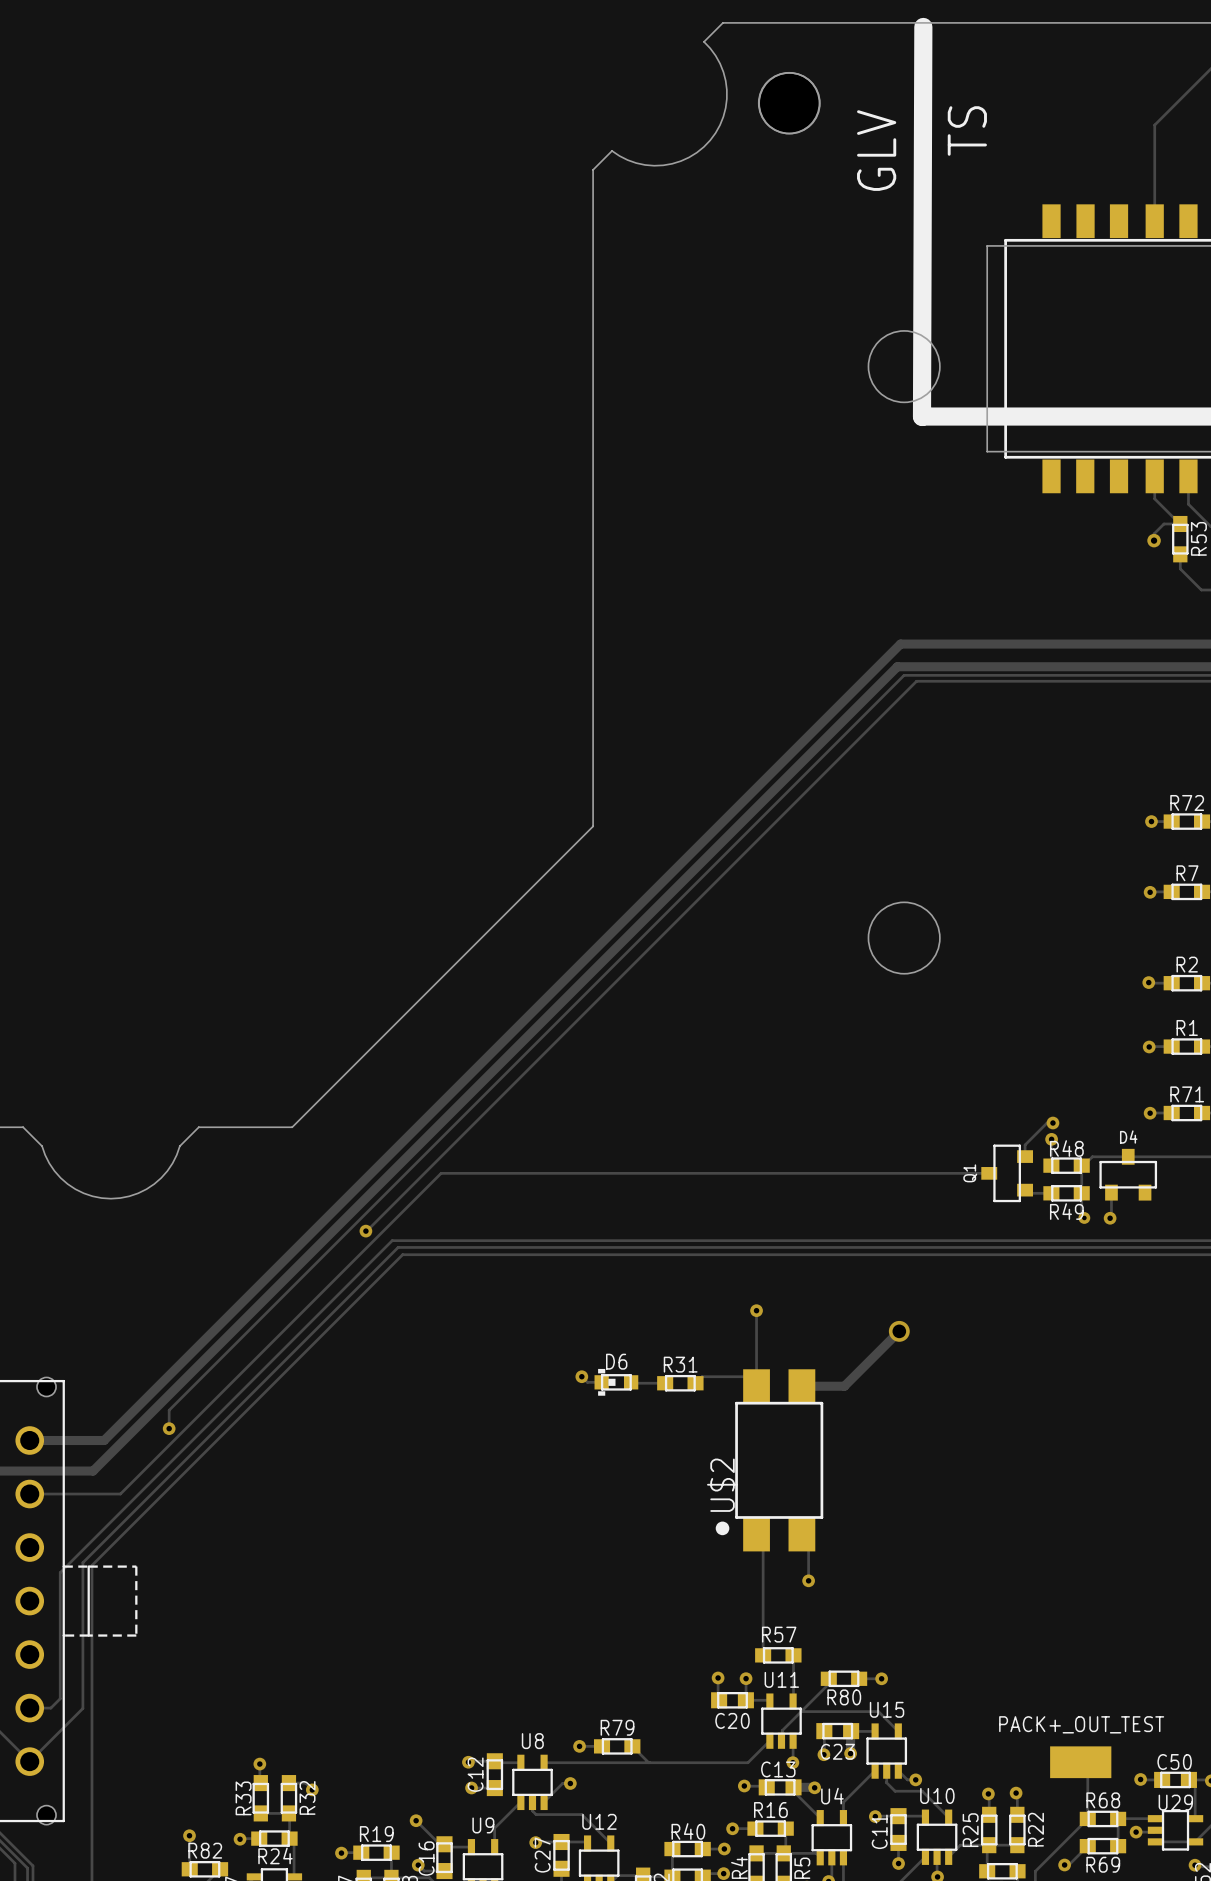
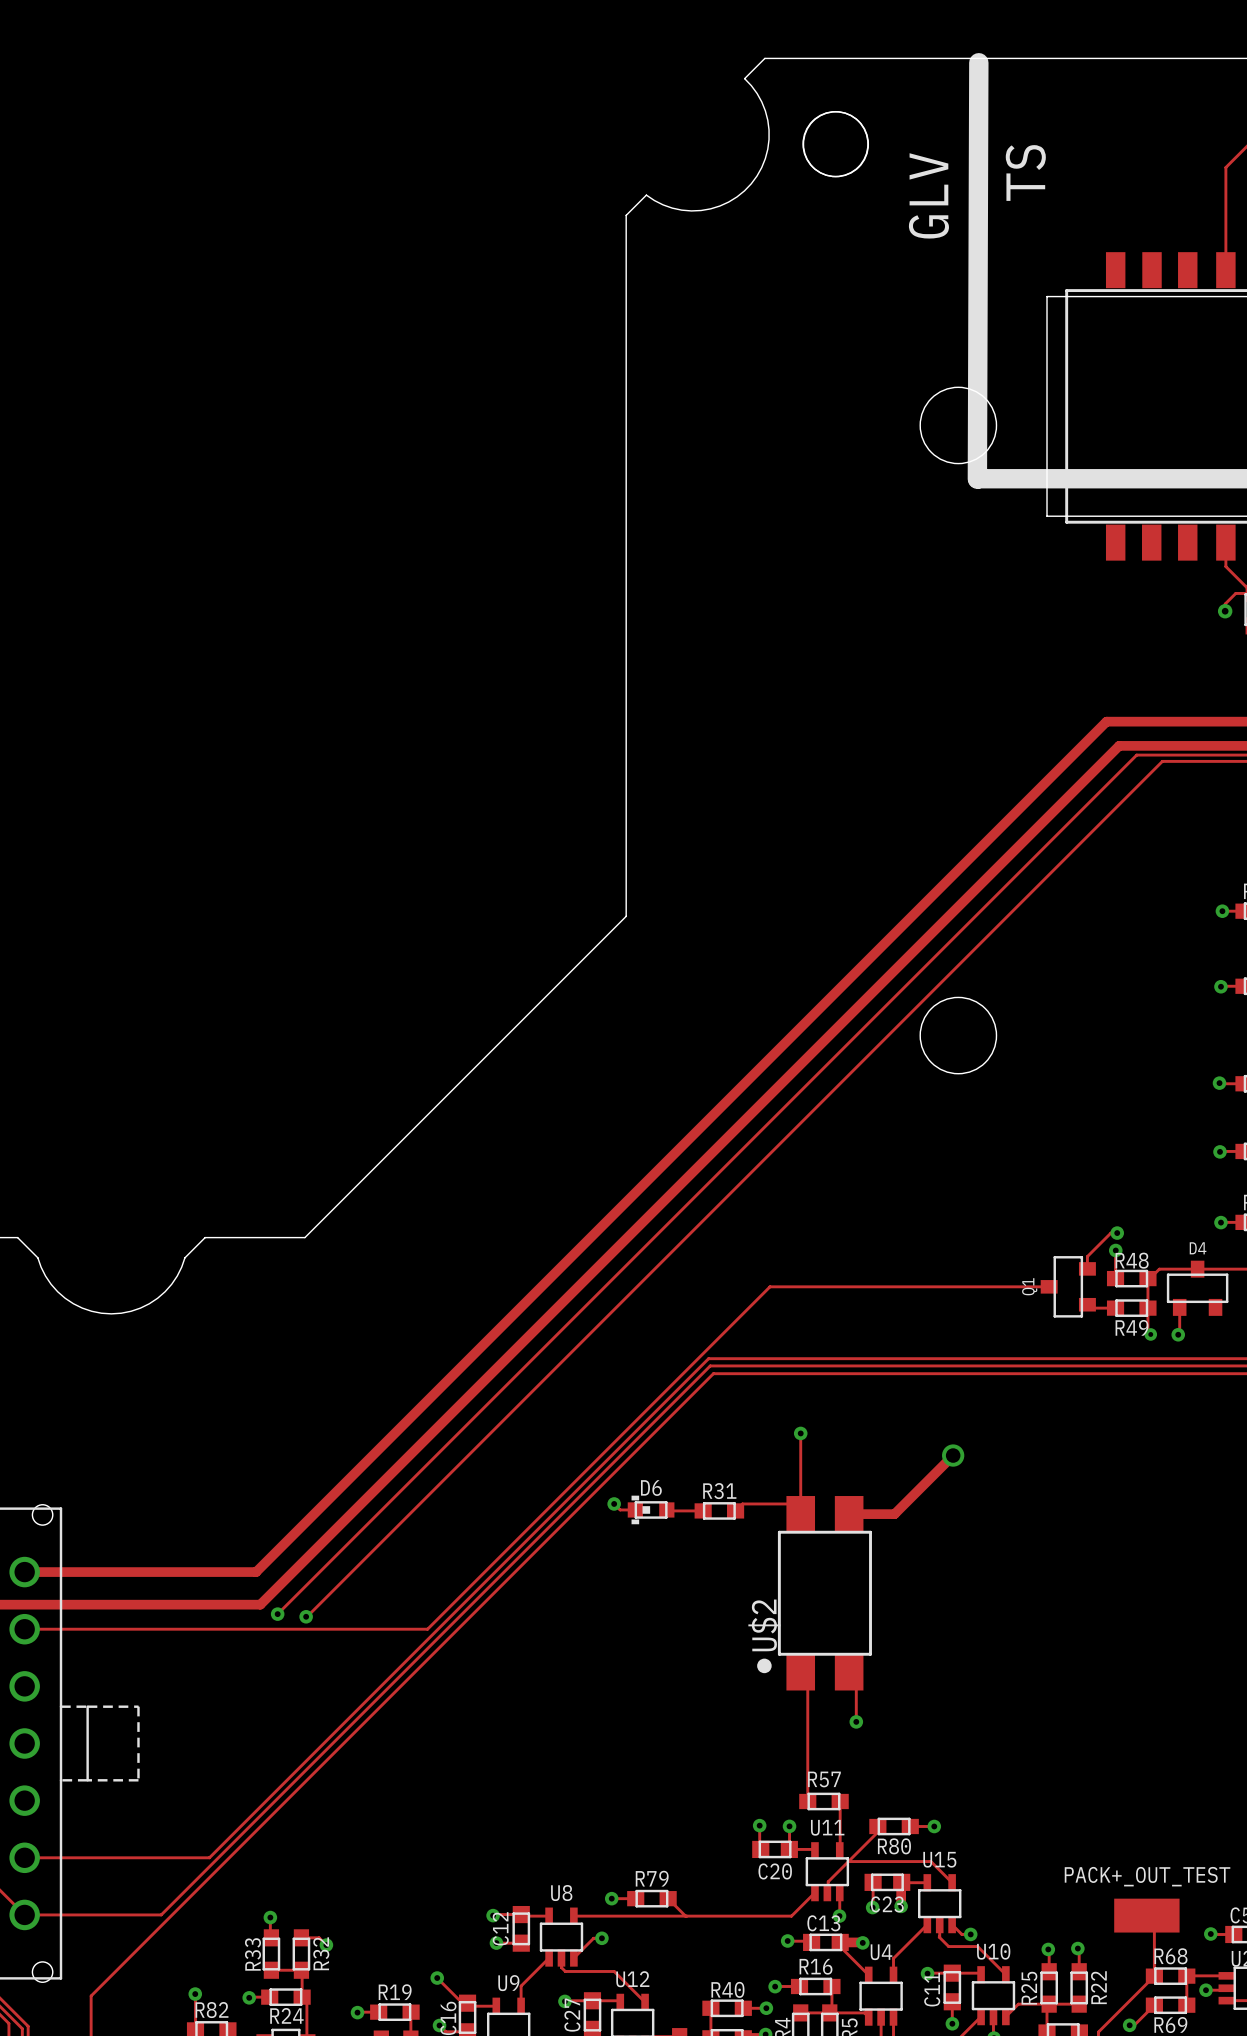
track: (1042, 644) (900, 644) (104, 1440) -> (1106, 721) (256, 1572) (104, 1572)
track: (1054, 666) (897, 666) (93, 1471) -> (1119, 745) (260, 1604) (92, 1604)
track: (1071, 675) (904, 675) (169, 1410) (169, 1428) -> (1136, 755) (277, 1614)
track: (1095, 681) (916, 681) (365, 1231) -> (1162, 761) (306, 1616)
track: (727, 1173) (441, 1173) (120, 1494) -> (769, 1286) (427, 1629) (121, 1629)
via: (365, 1231) -> none
track: (670, 1240) (392, 1240) (60, 1572) (60, 1698) (50, 1708) -> (708, 1358) (209, 1857) (47, 1857)
track: (671, 1247) (398, 1247) (82, 1562) (82, 1708) (29, 1761) -> (710, 1365) (161, 1914) (24, 1914)
track: (674, 1254) (402, 1254) (91, 1565) (91, 1837) -> (713, 1373) (91, 1995)
via: (169, 1428) -> none
via: none -> (277, 1614)
via: none -> (306, 1616)

